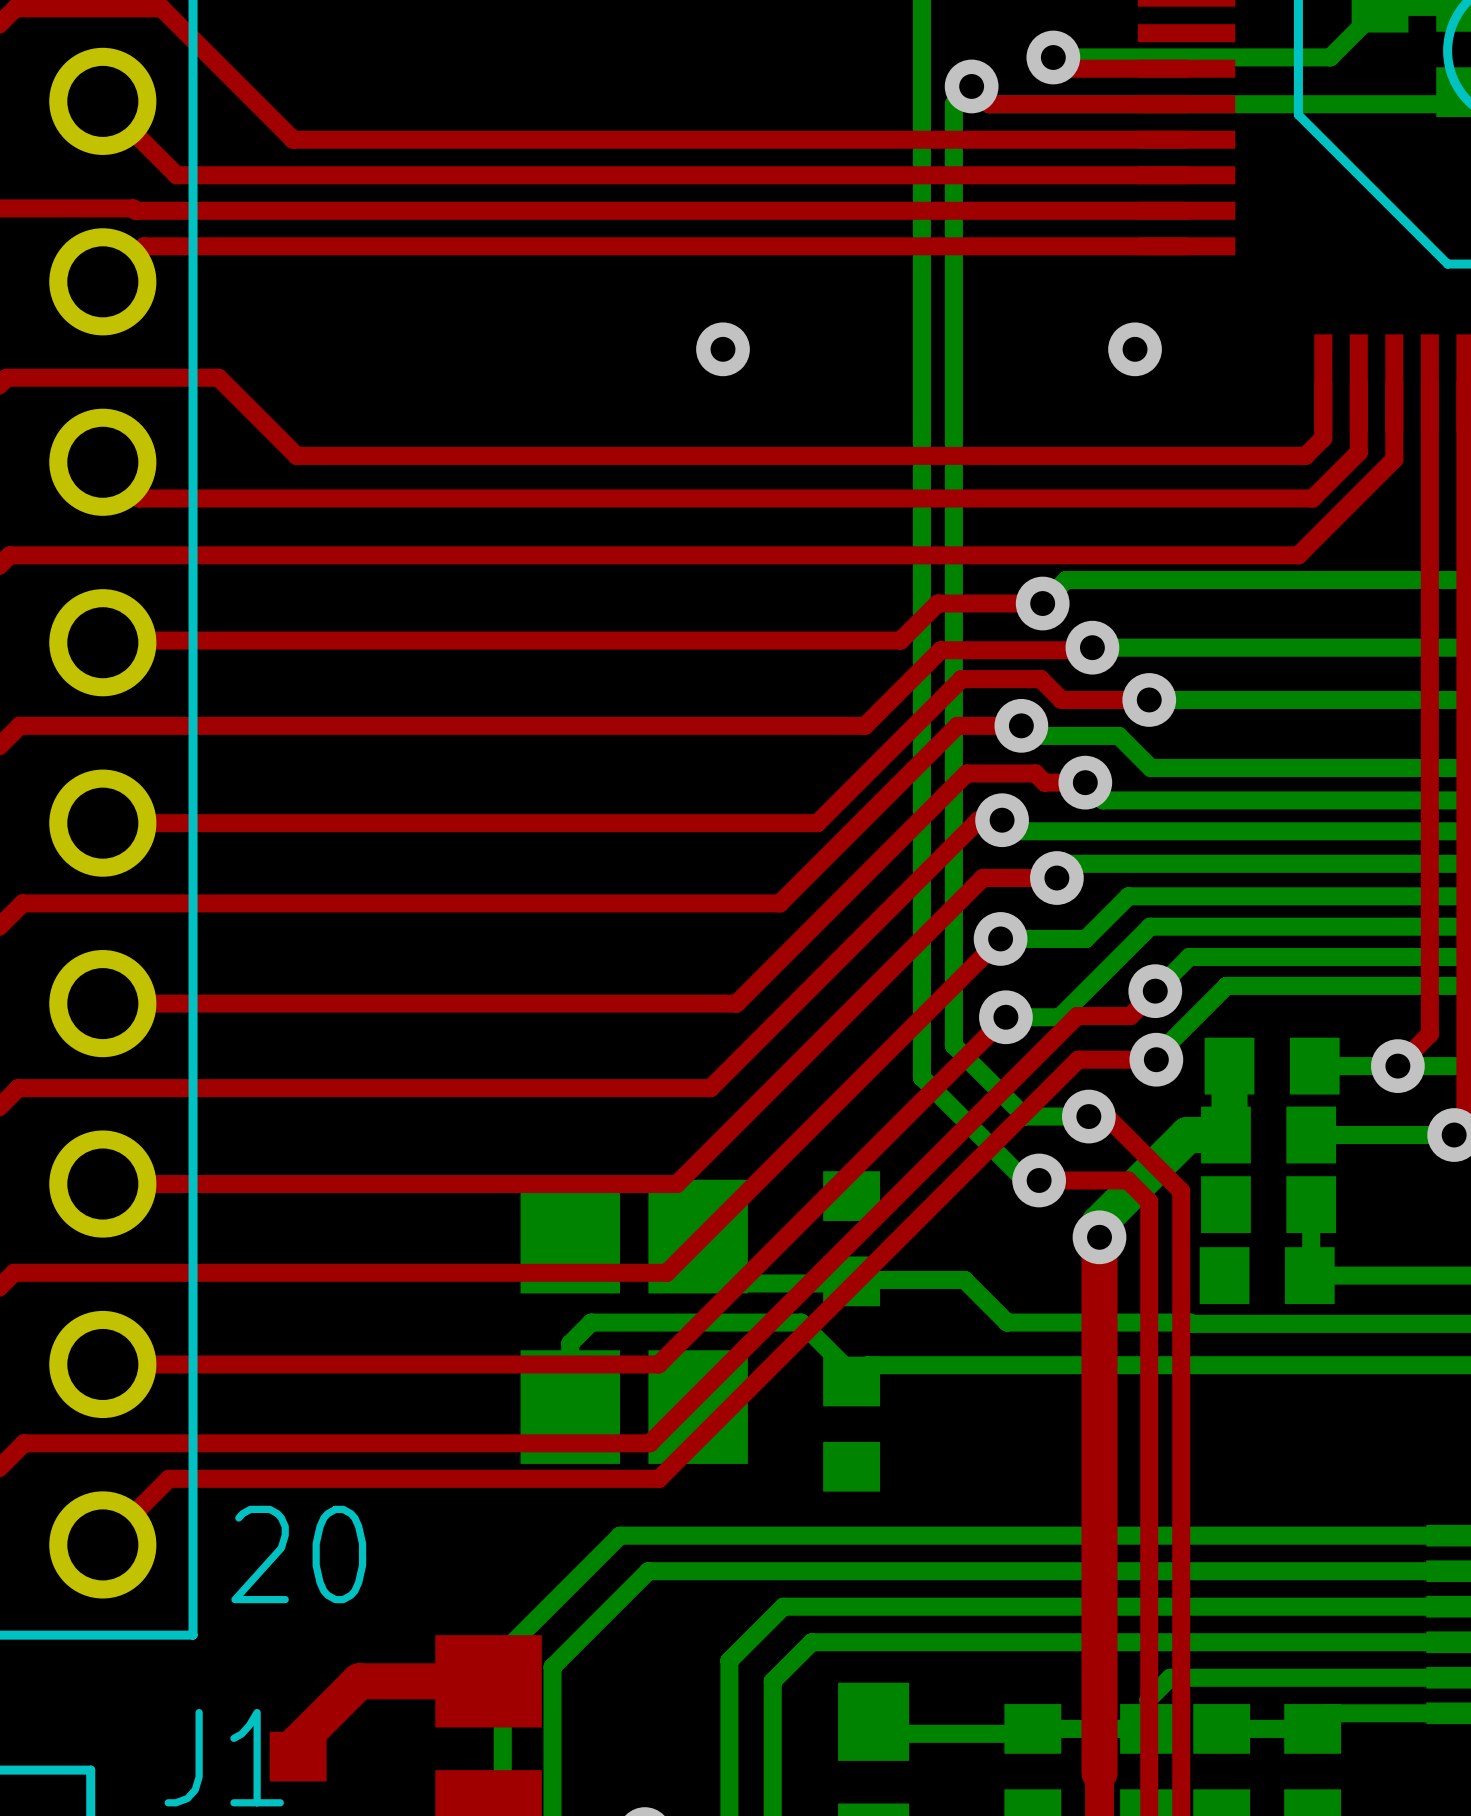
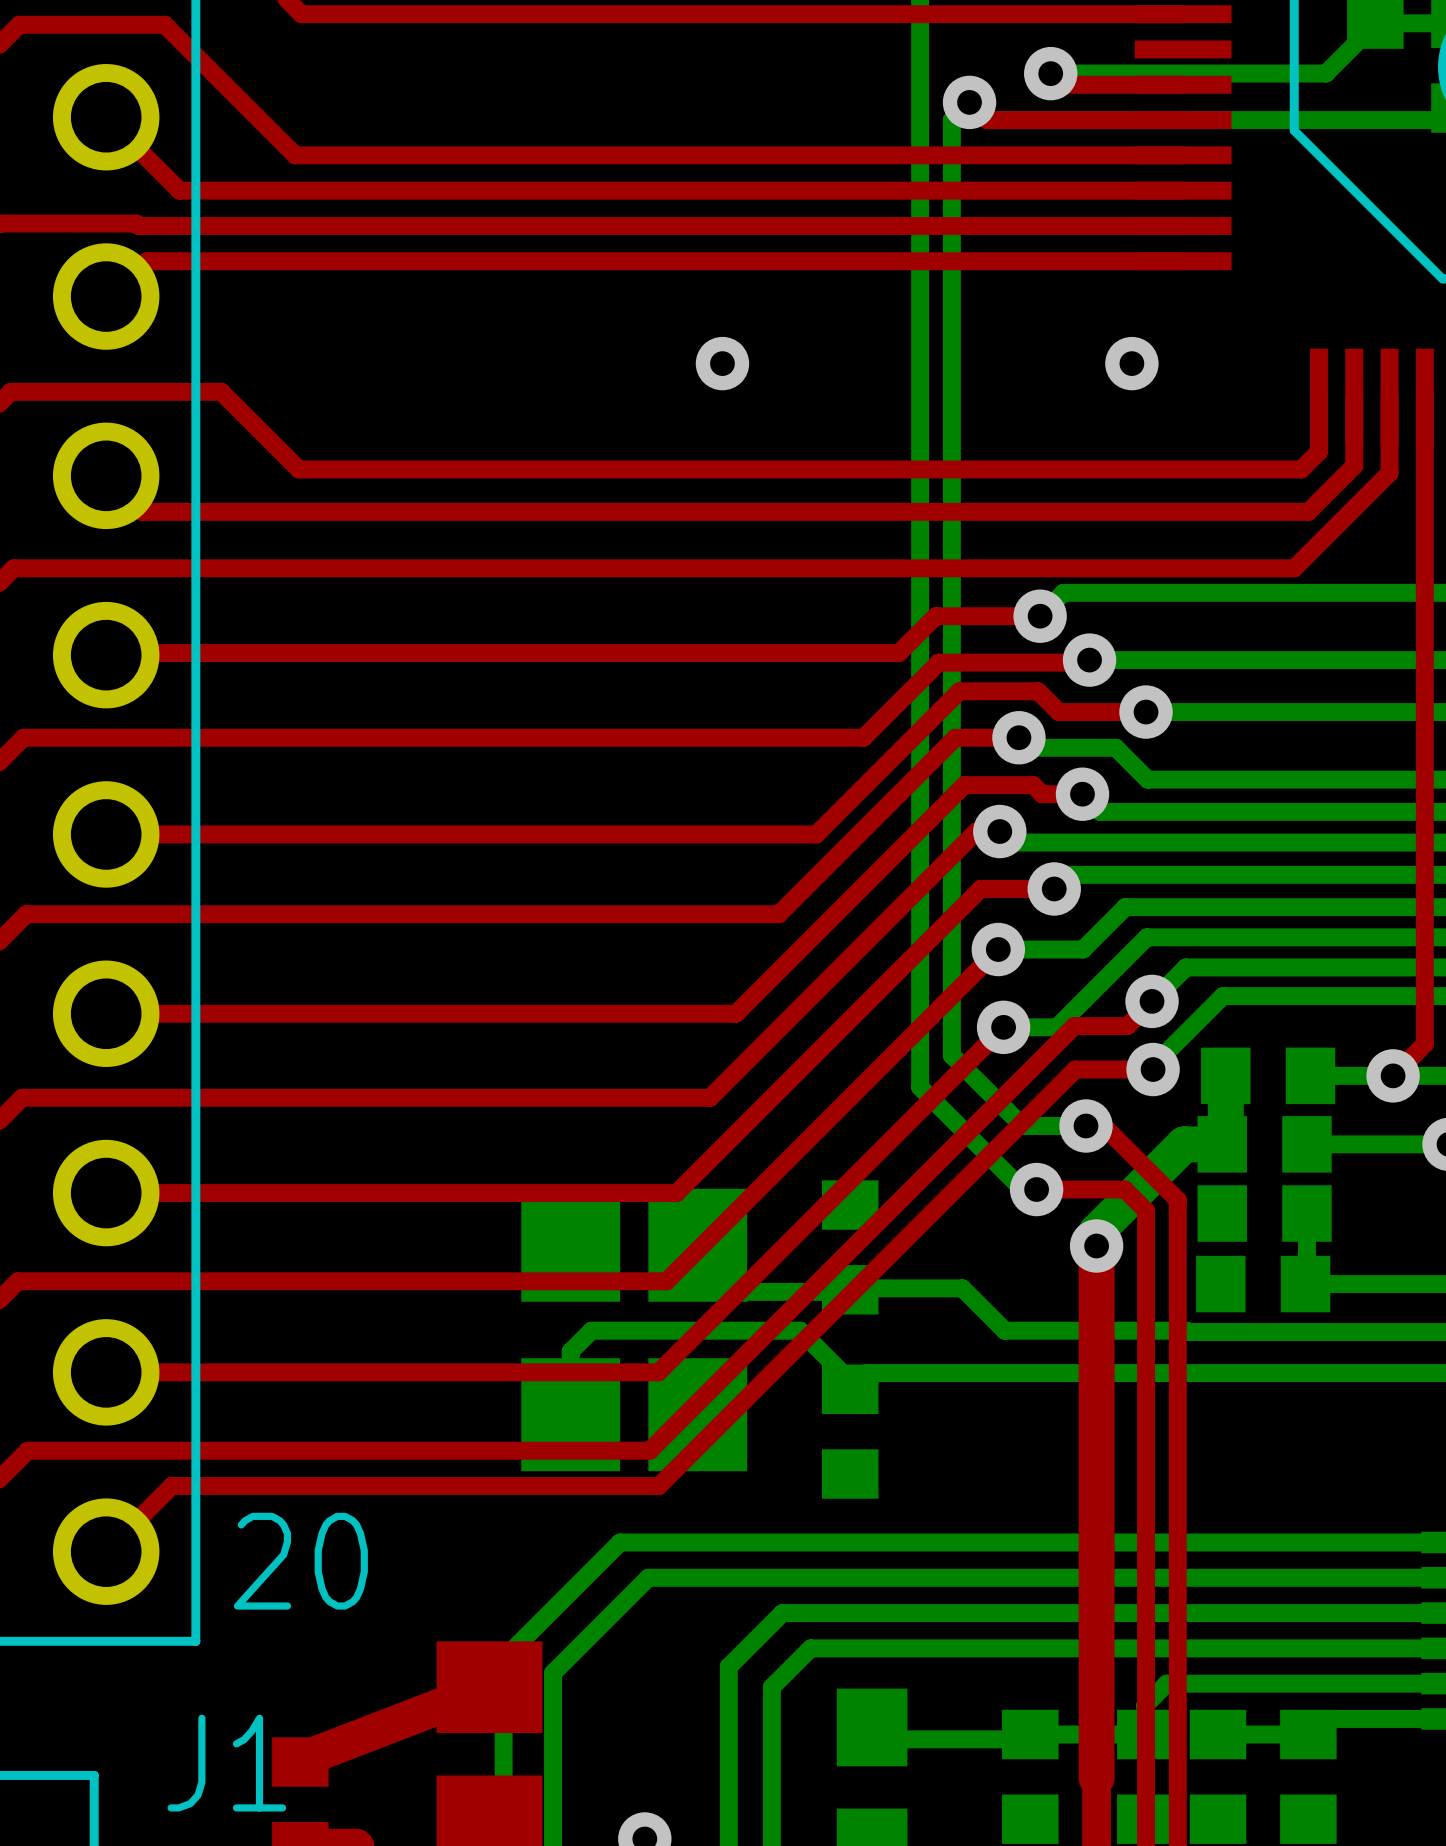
top track: (488, 1681) (359, 1681) (298, 1742) (298, 1756) -> (489, 1687) (298, 1760) (300, 1762)

